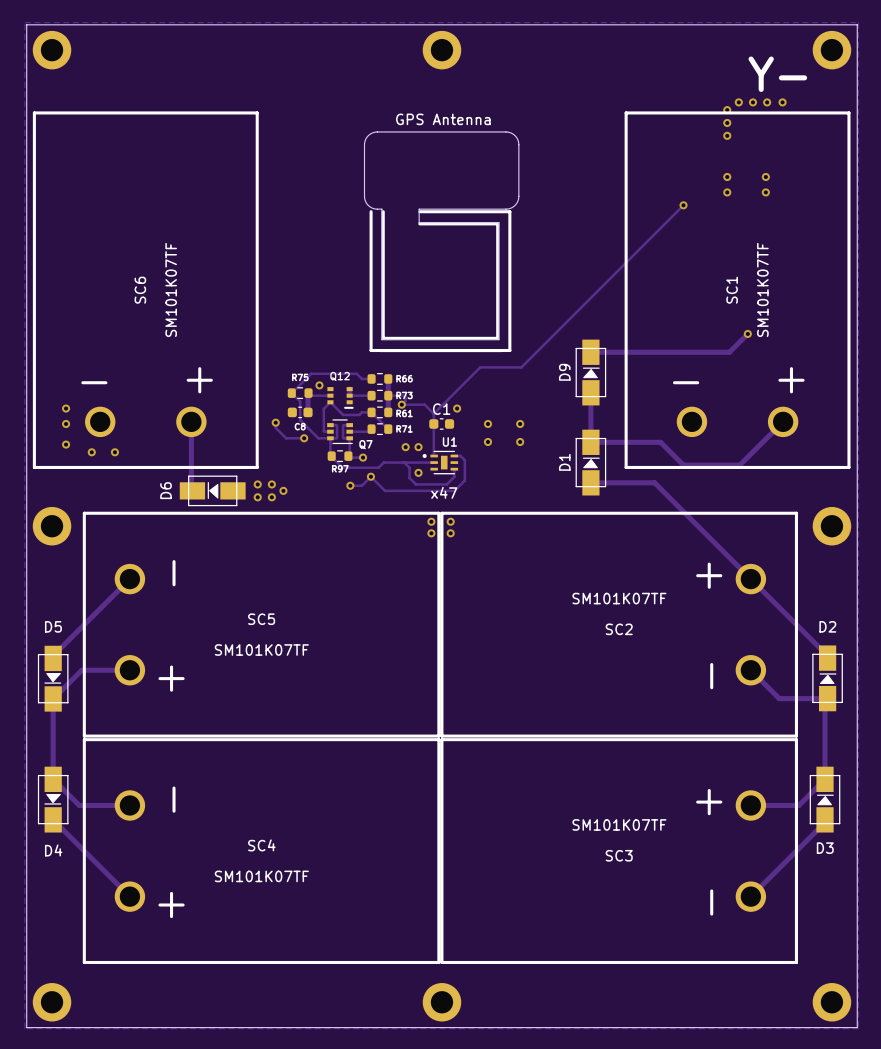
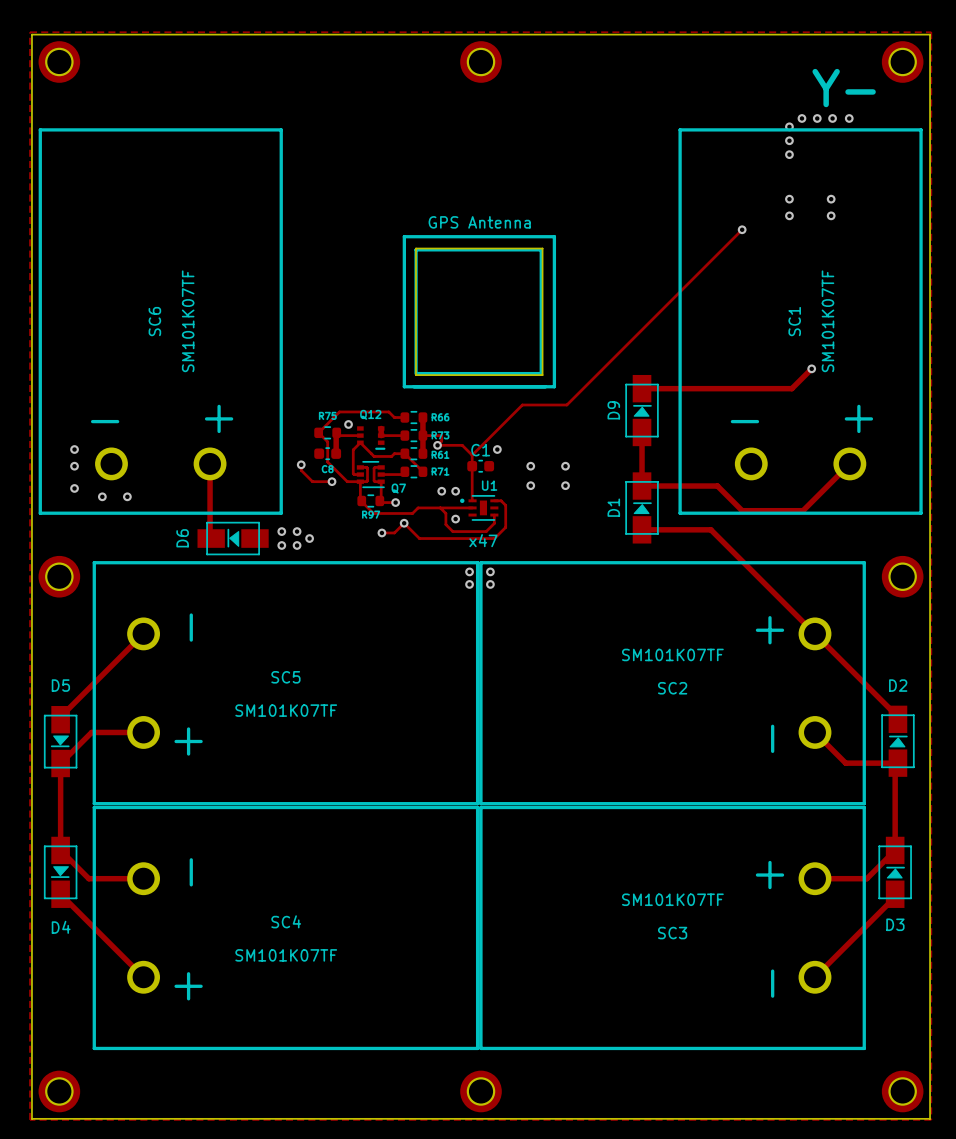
text position: GPS Antenna (443, 119) -> GPS Antenna (479, 222)
drawing shape: [369, 210, 512, 353] -> [402, 235, 557, 389]
board edge: (381, 222) (381, 209) (370, 207) (364, 197) (364, 143) (370, 133) (377, 131) (506, 131) (515, 135) (518, 144) (518, 196) (515, 205) (506, 209) (419, 209) (419, 222) -> (416, 248) (456, 248)

